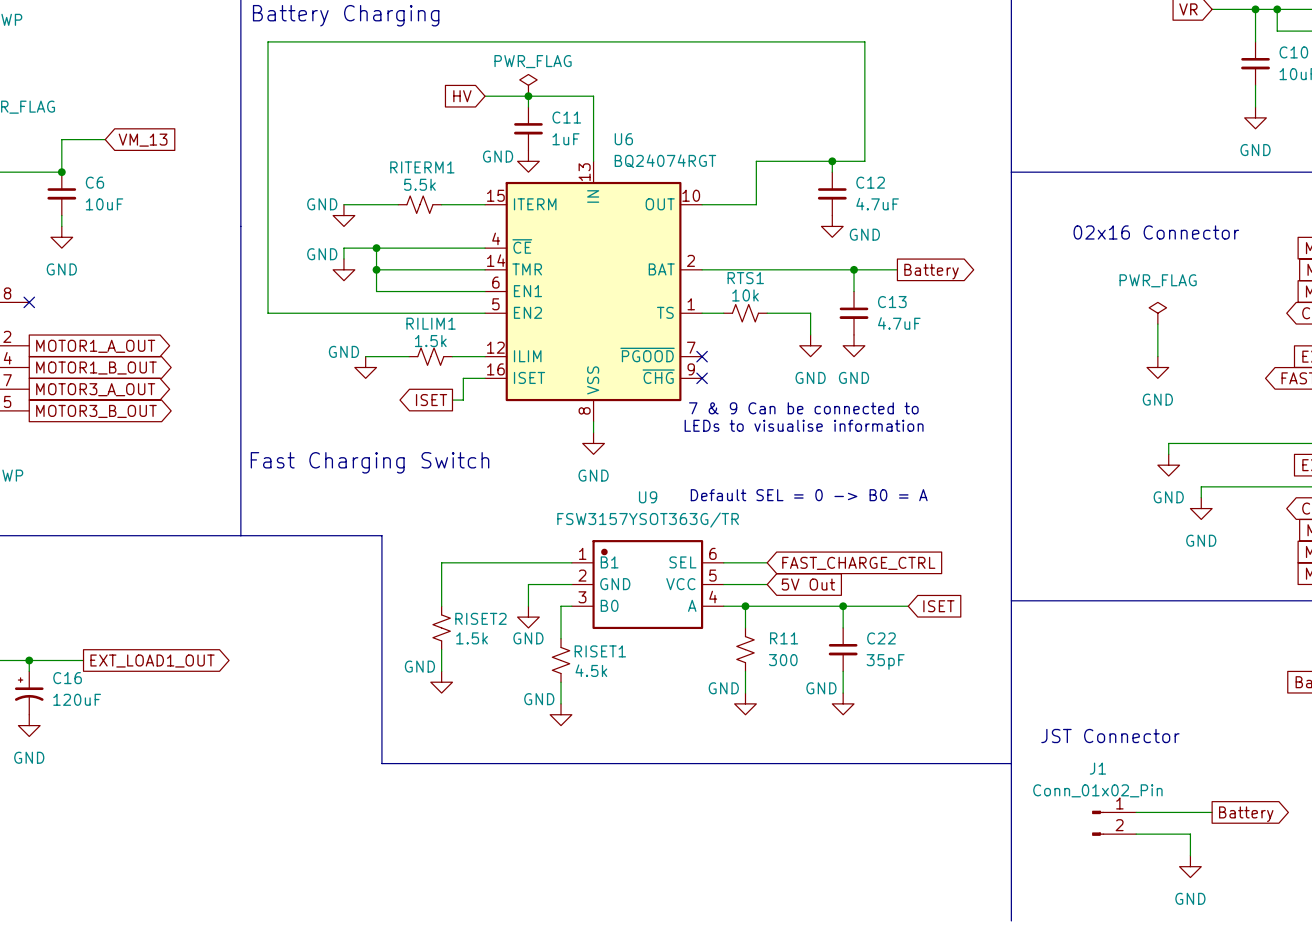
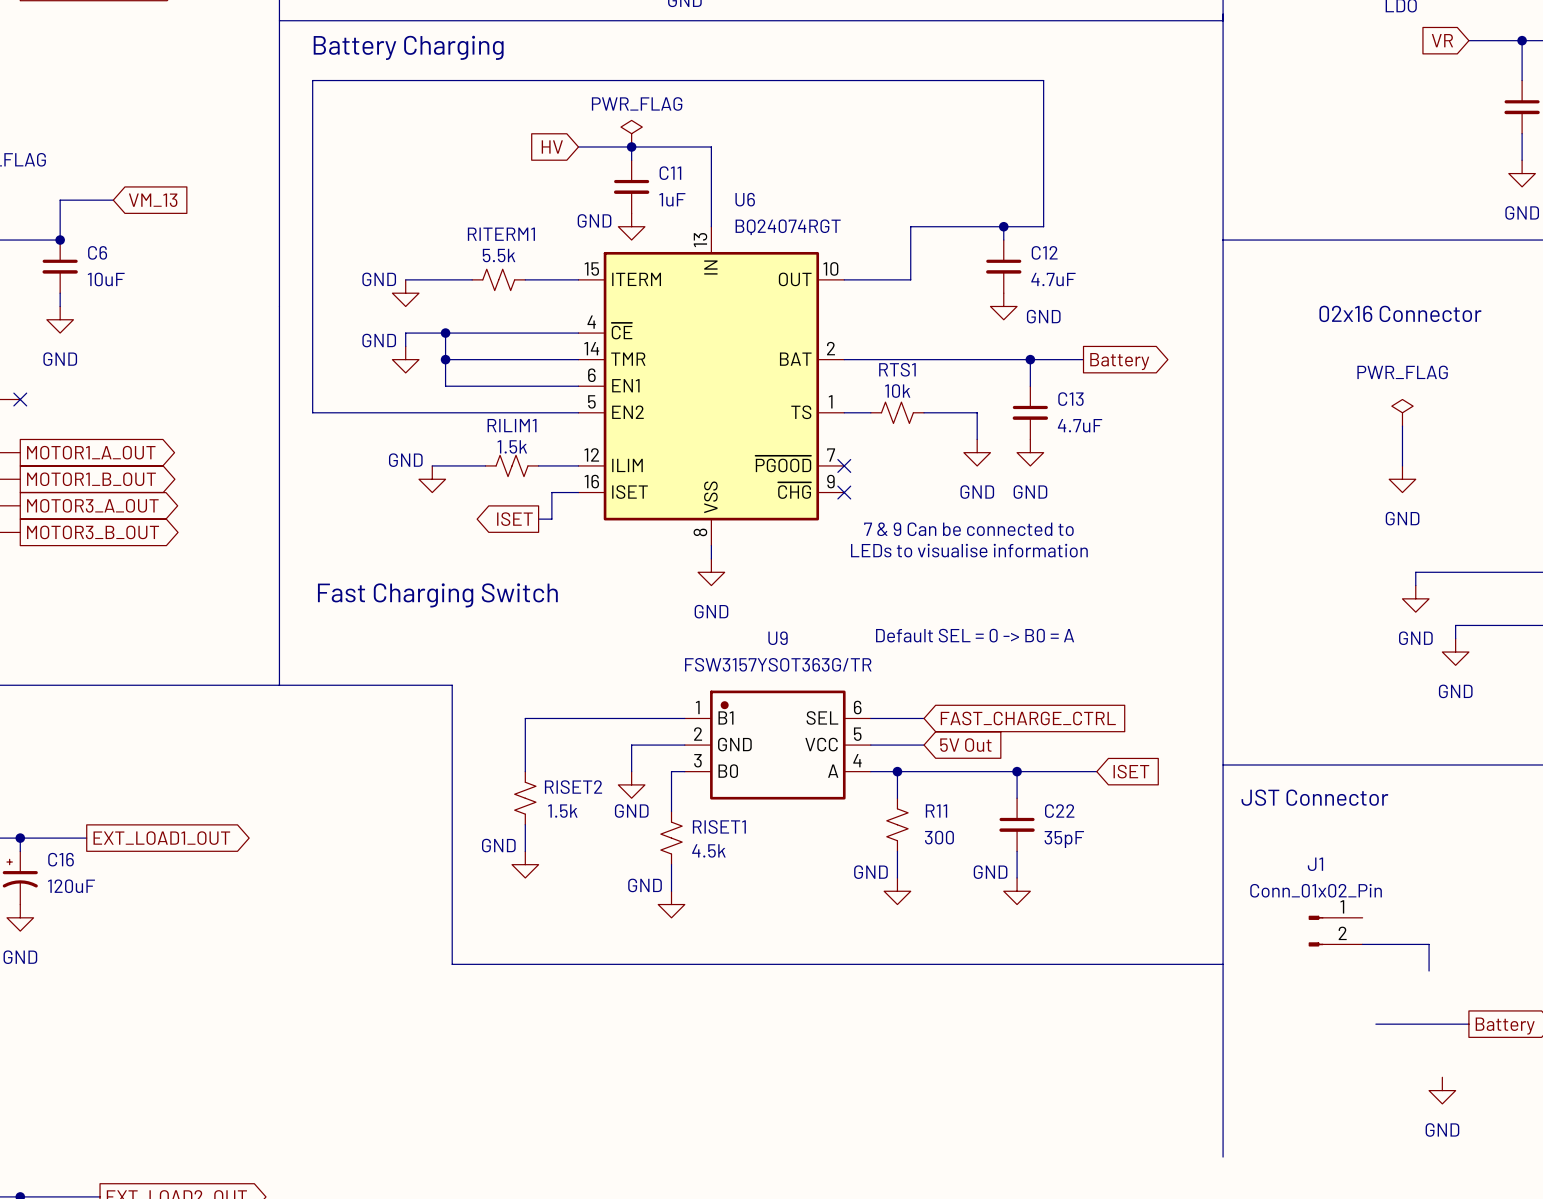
text position: JST Connector (1110, 736) -> JST Connector (1314, 797)
J1 position: (1114, 823) -> (1335, 931)
wire: (1136, 834) (1190, 834) (1190, 855) -> (1362, 944) (1429, 944) (1429, 970)

